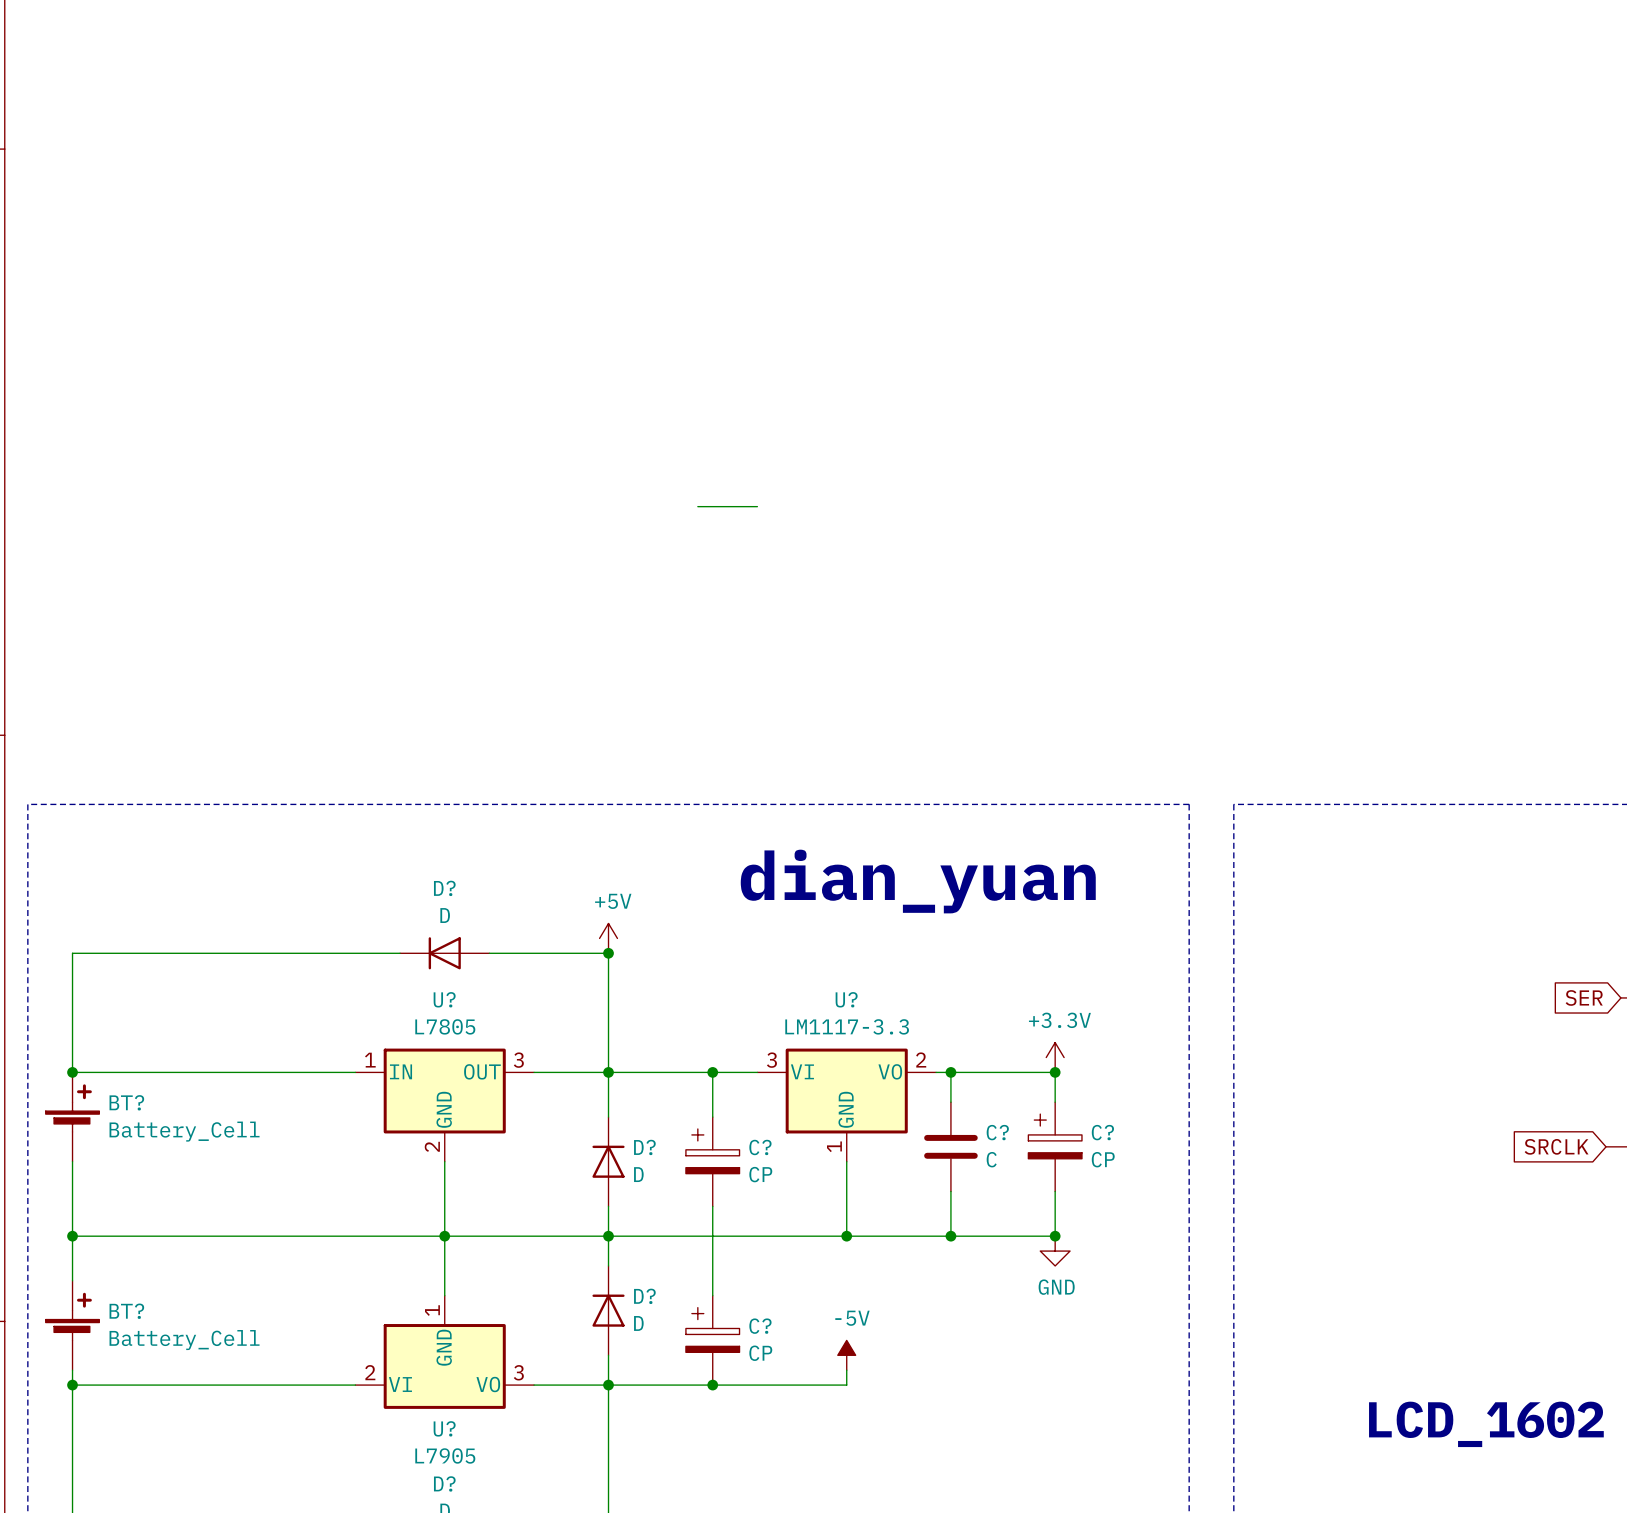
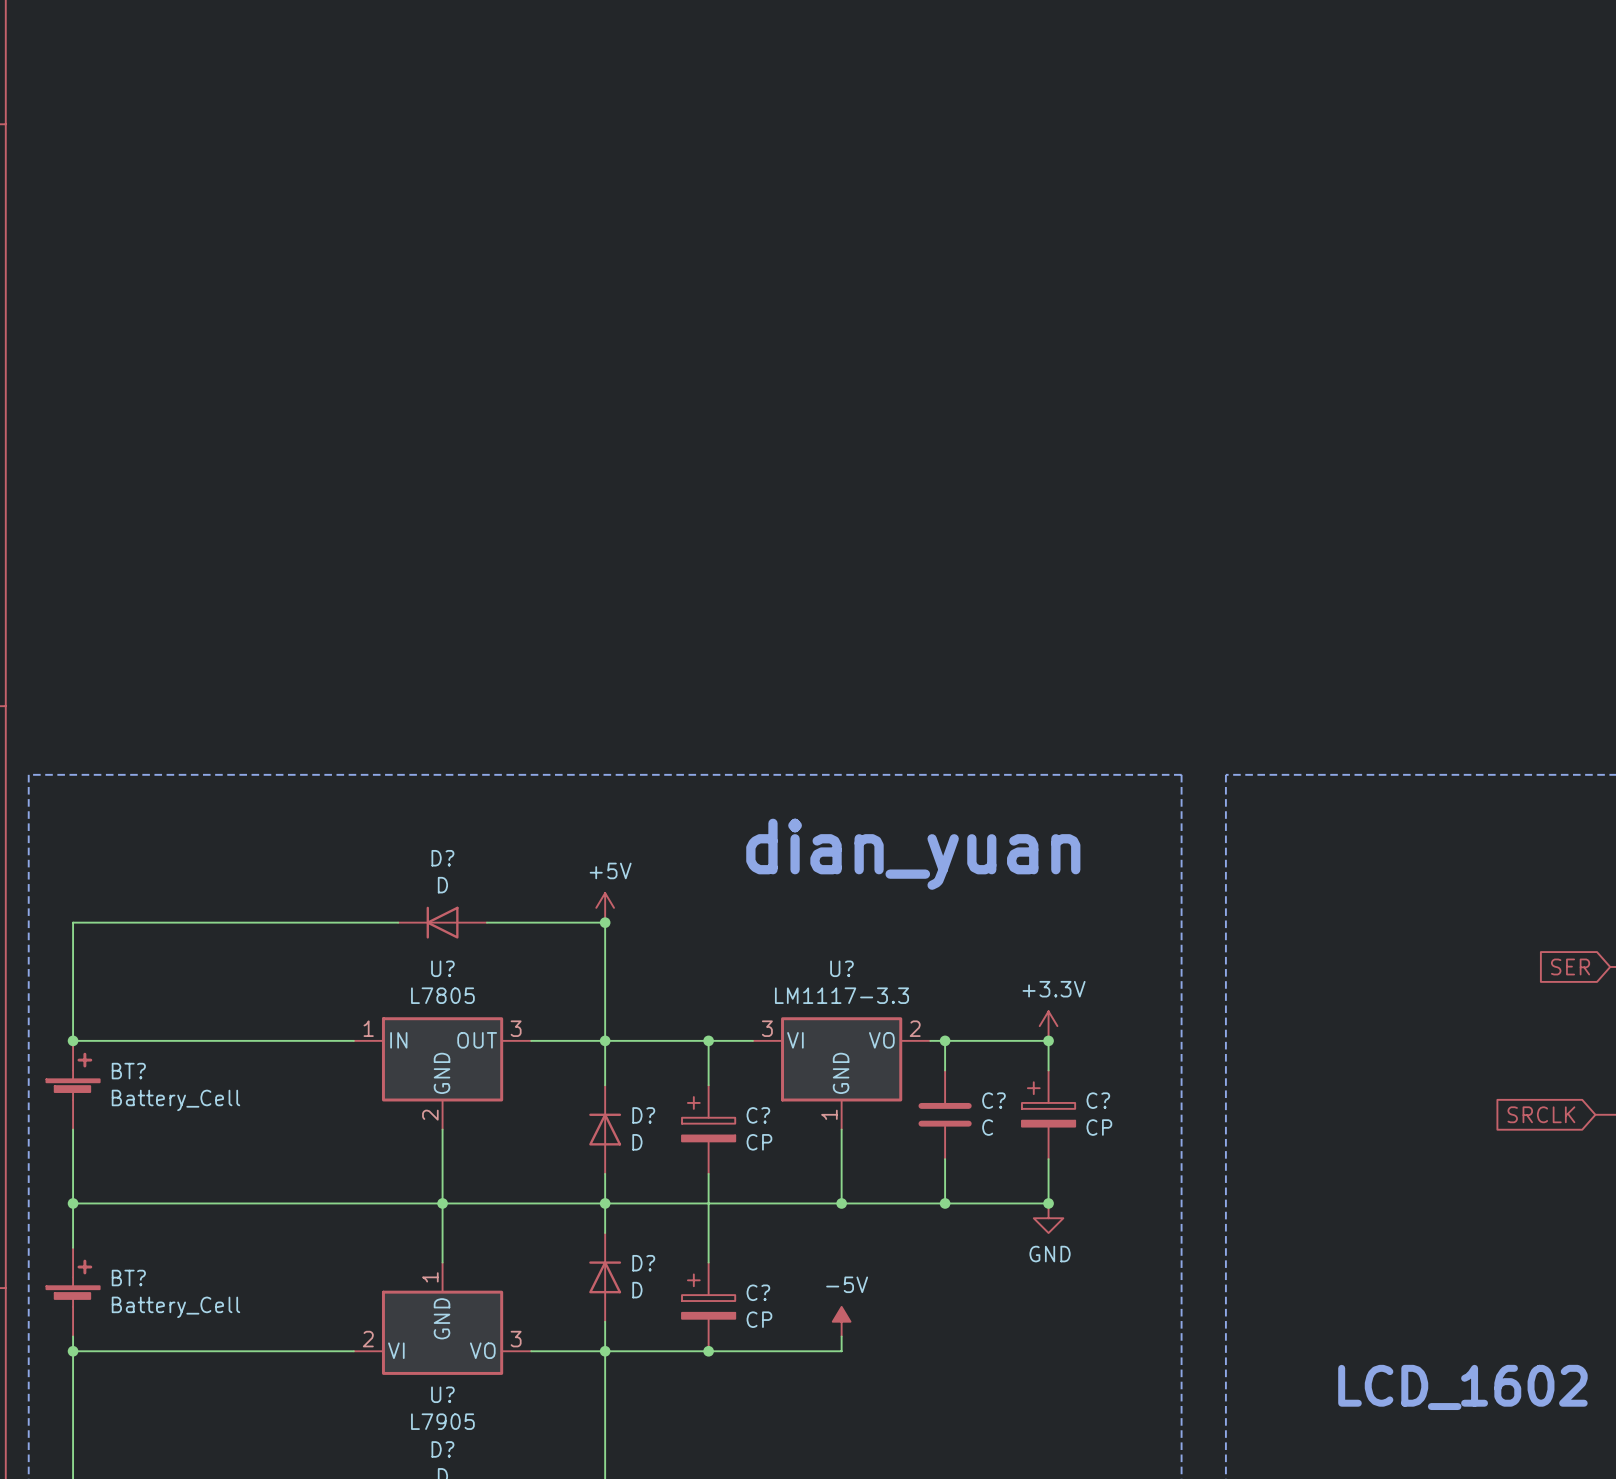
wire: (697, 506) (757, 506) -> none

